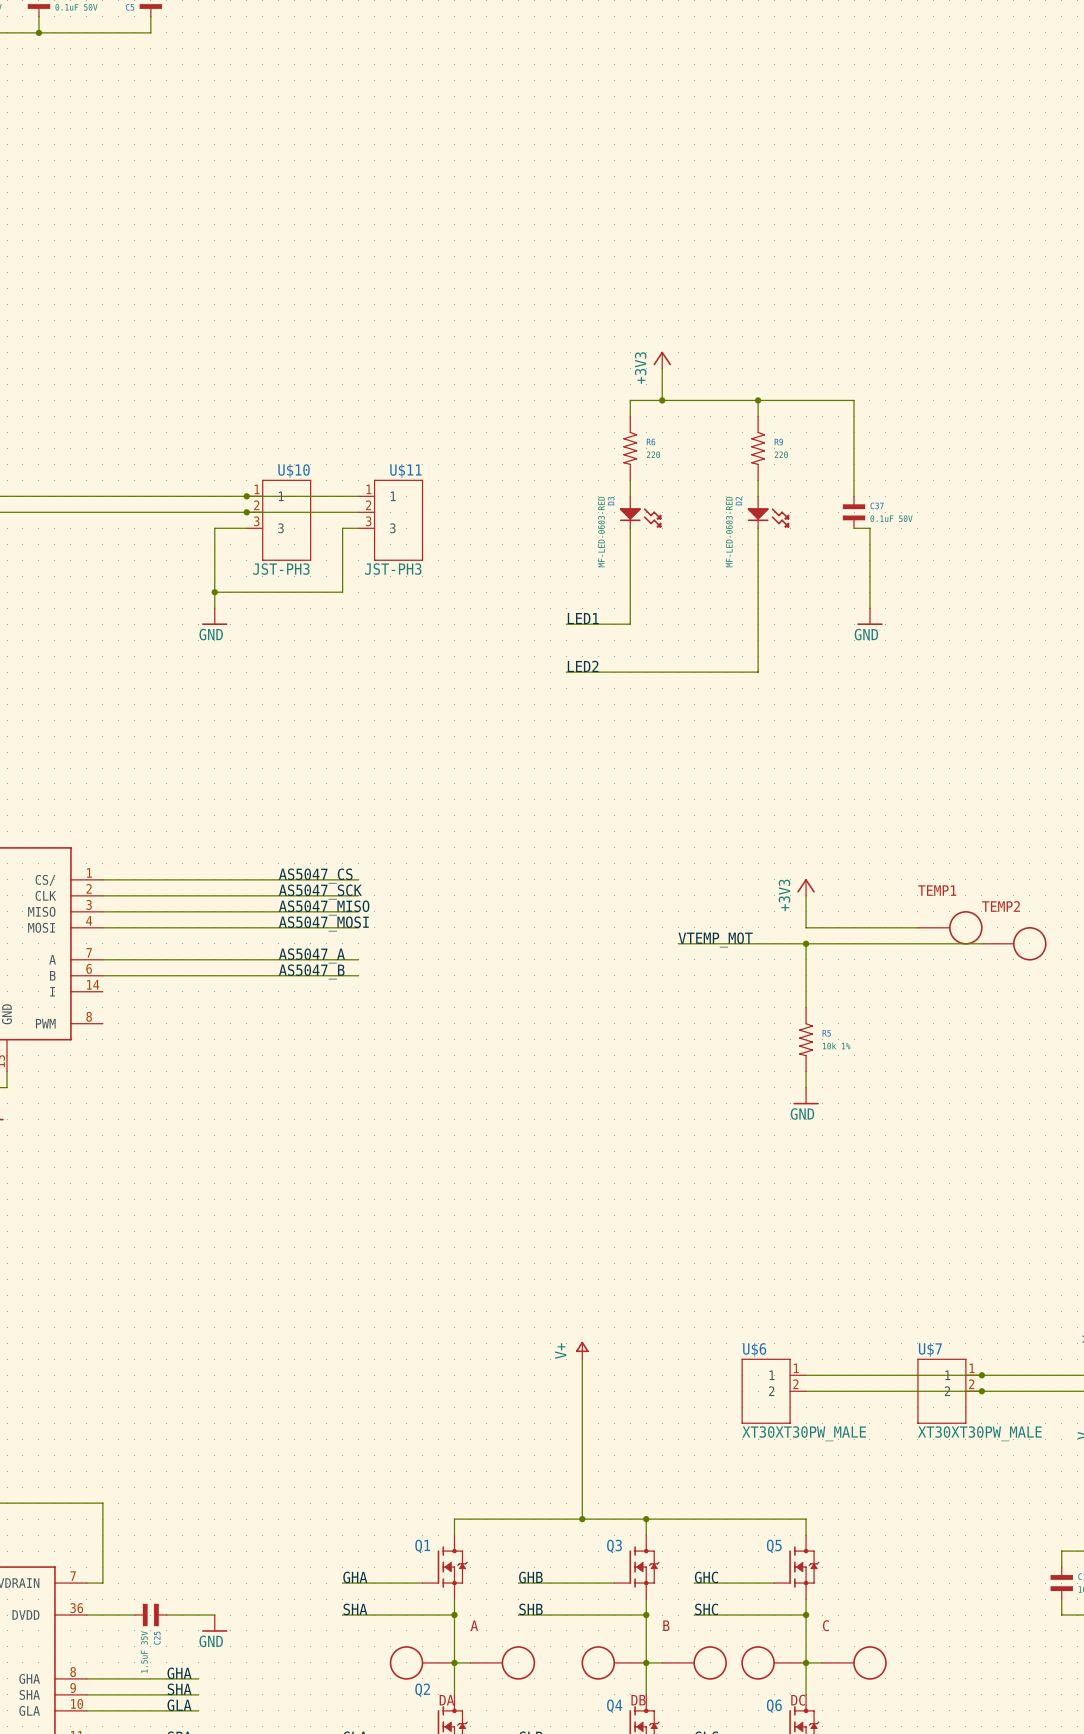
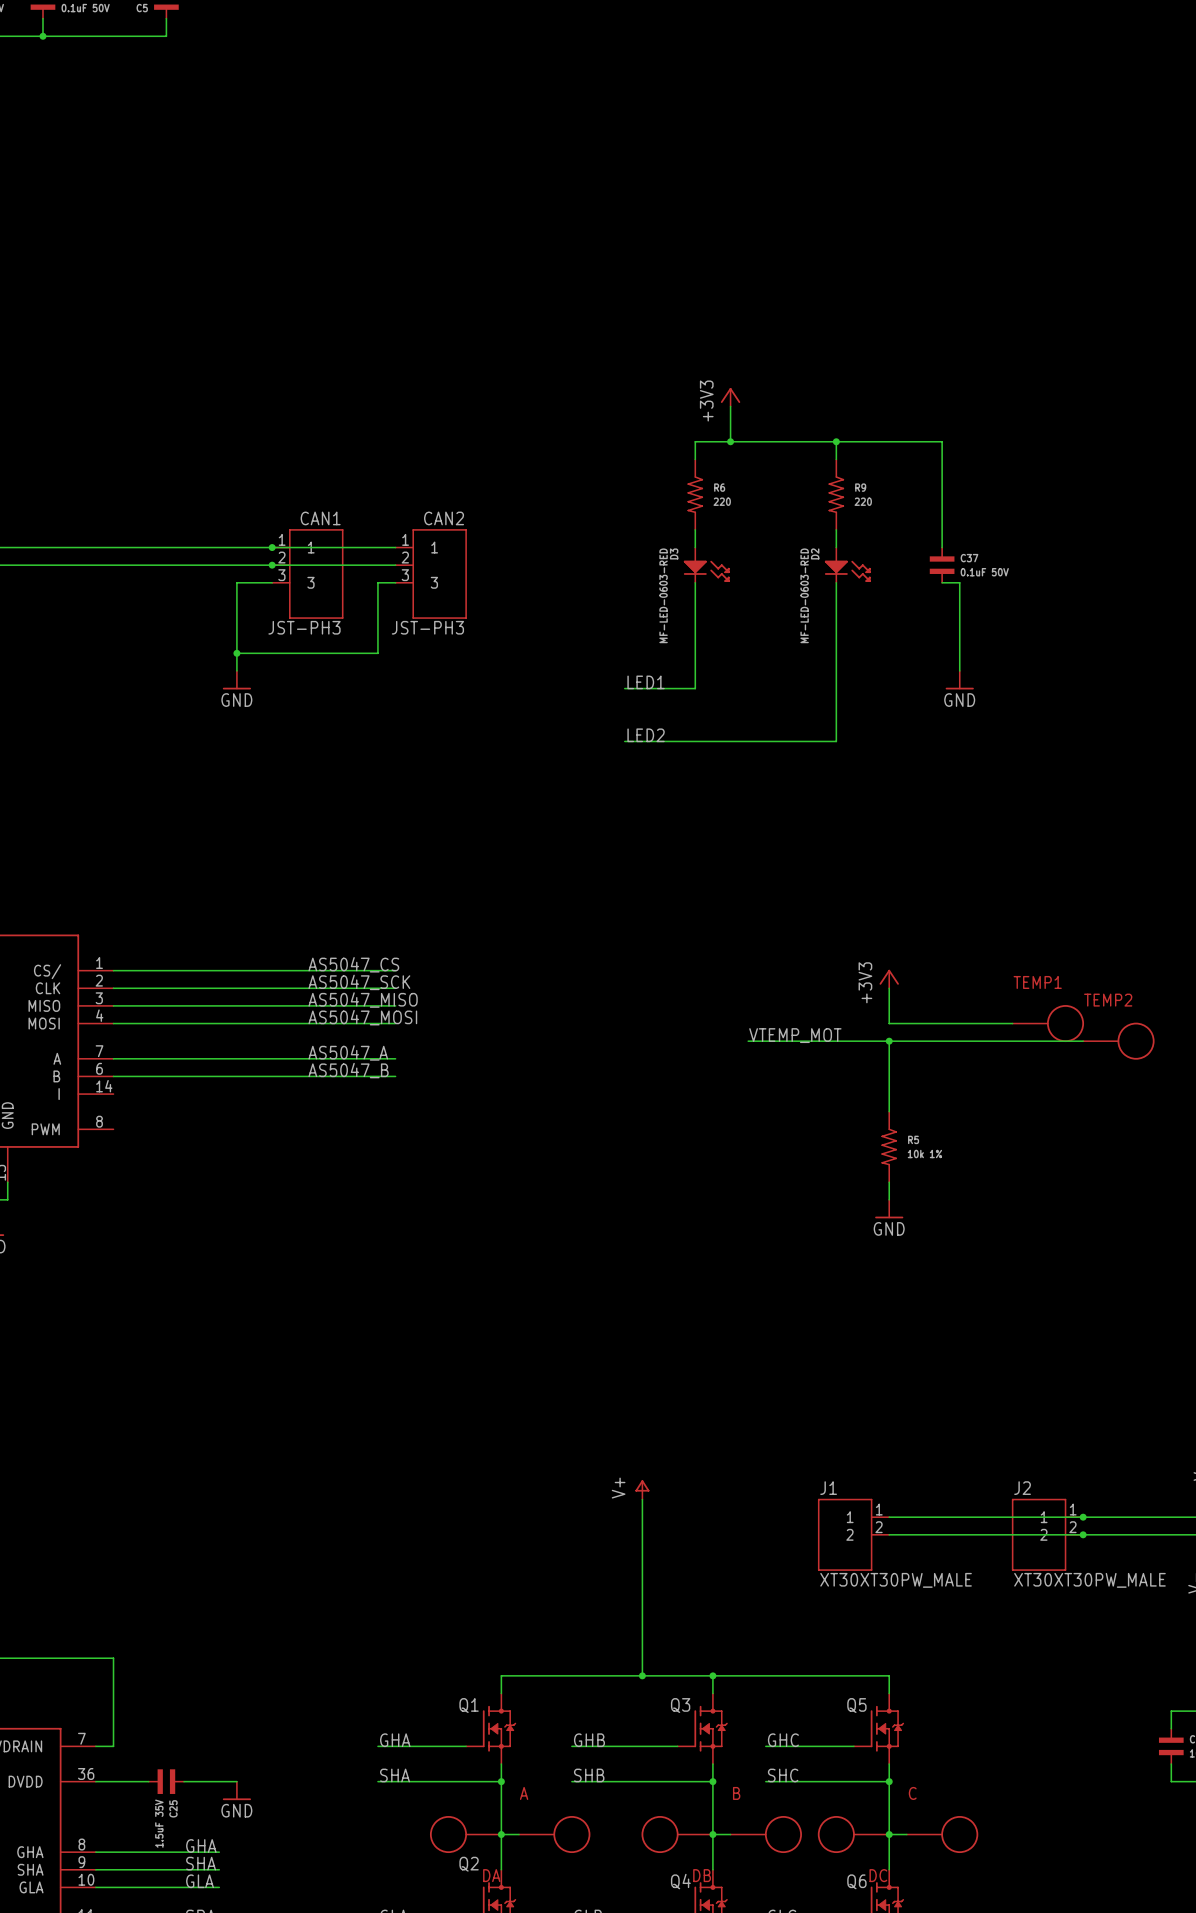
U$10 name: U$10 (294, 470) -> CAN1 (320, 518)
U$11 name: U$11 (405, 470) -> CAN2 (444, 518)
U$6 name: U$6 (754, 1349) -> J1 (828, 1488)
U$7 name: U$7 (930, 1349) -> J2 (1022, 1488)

